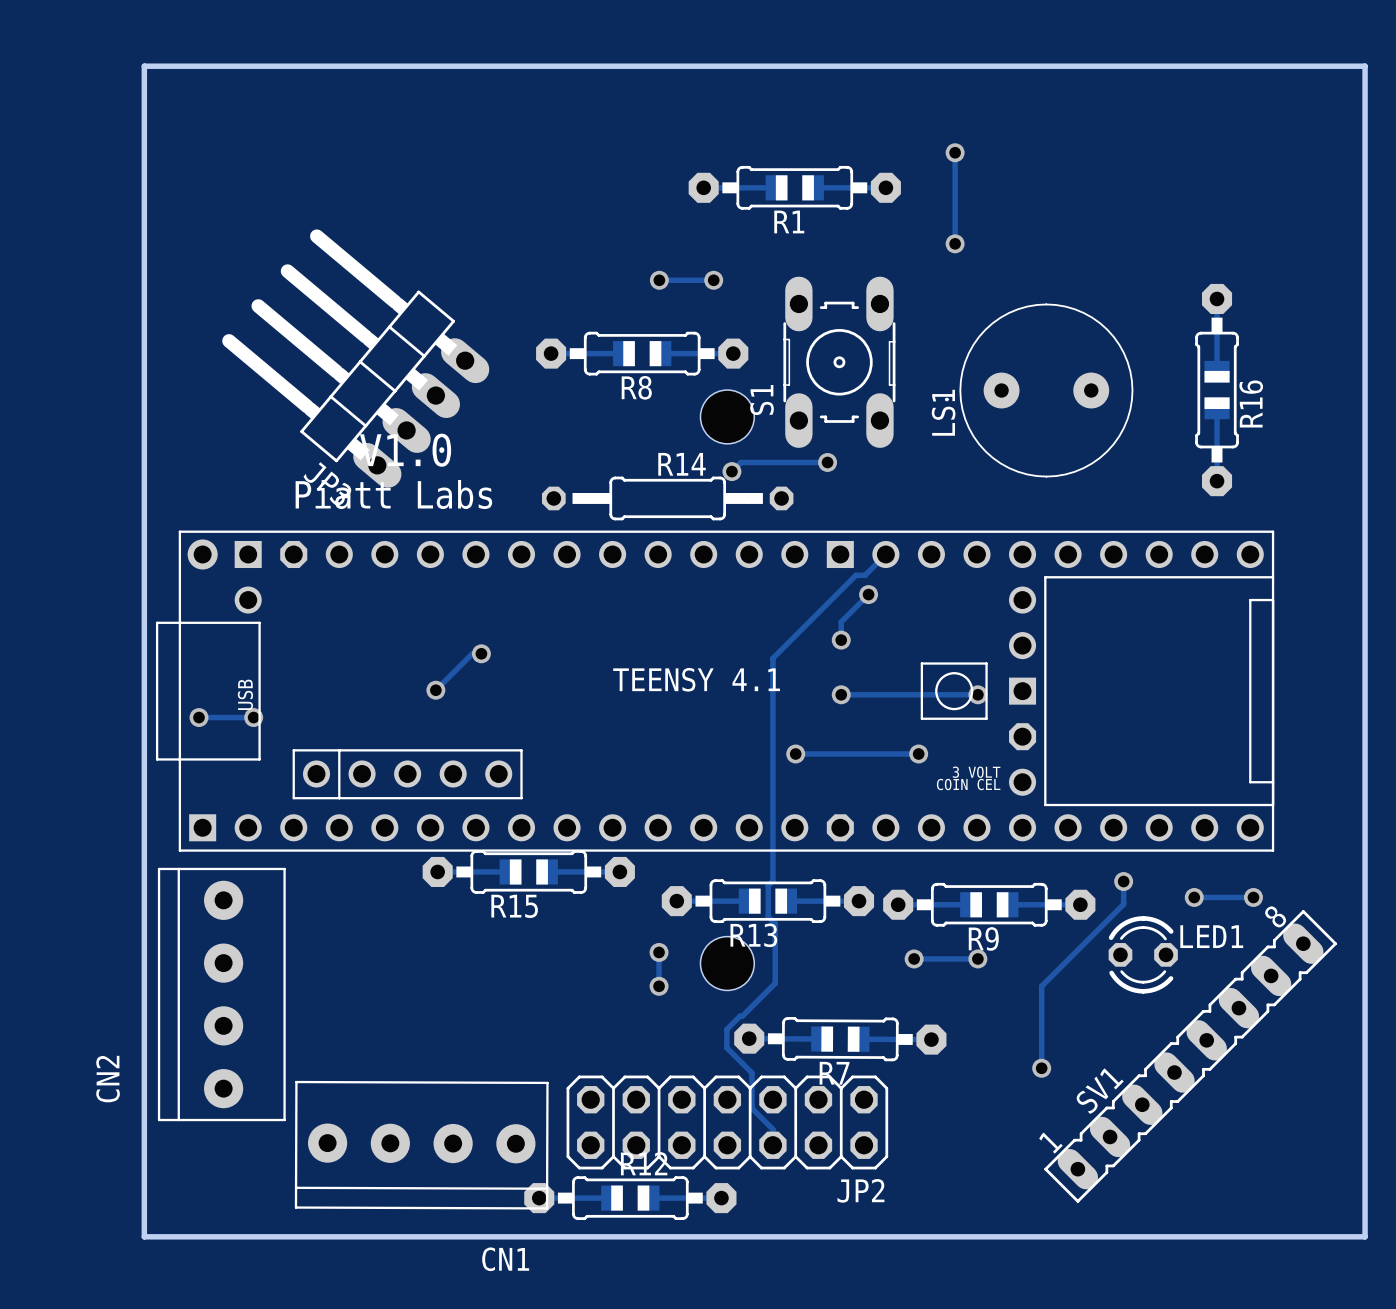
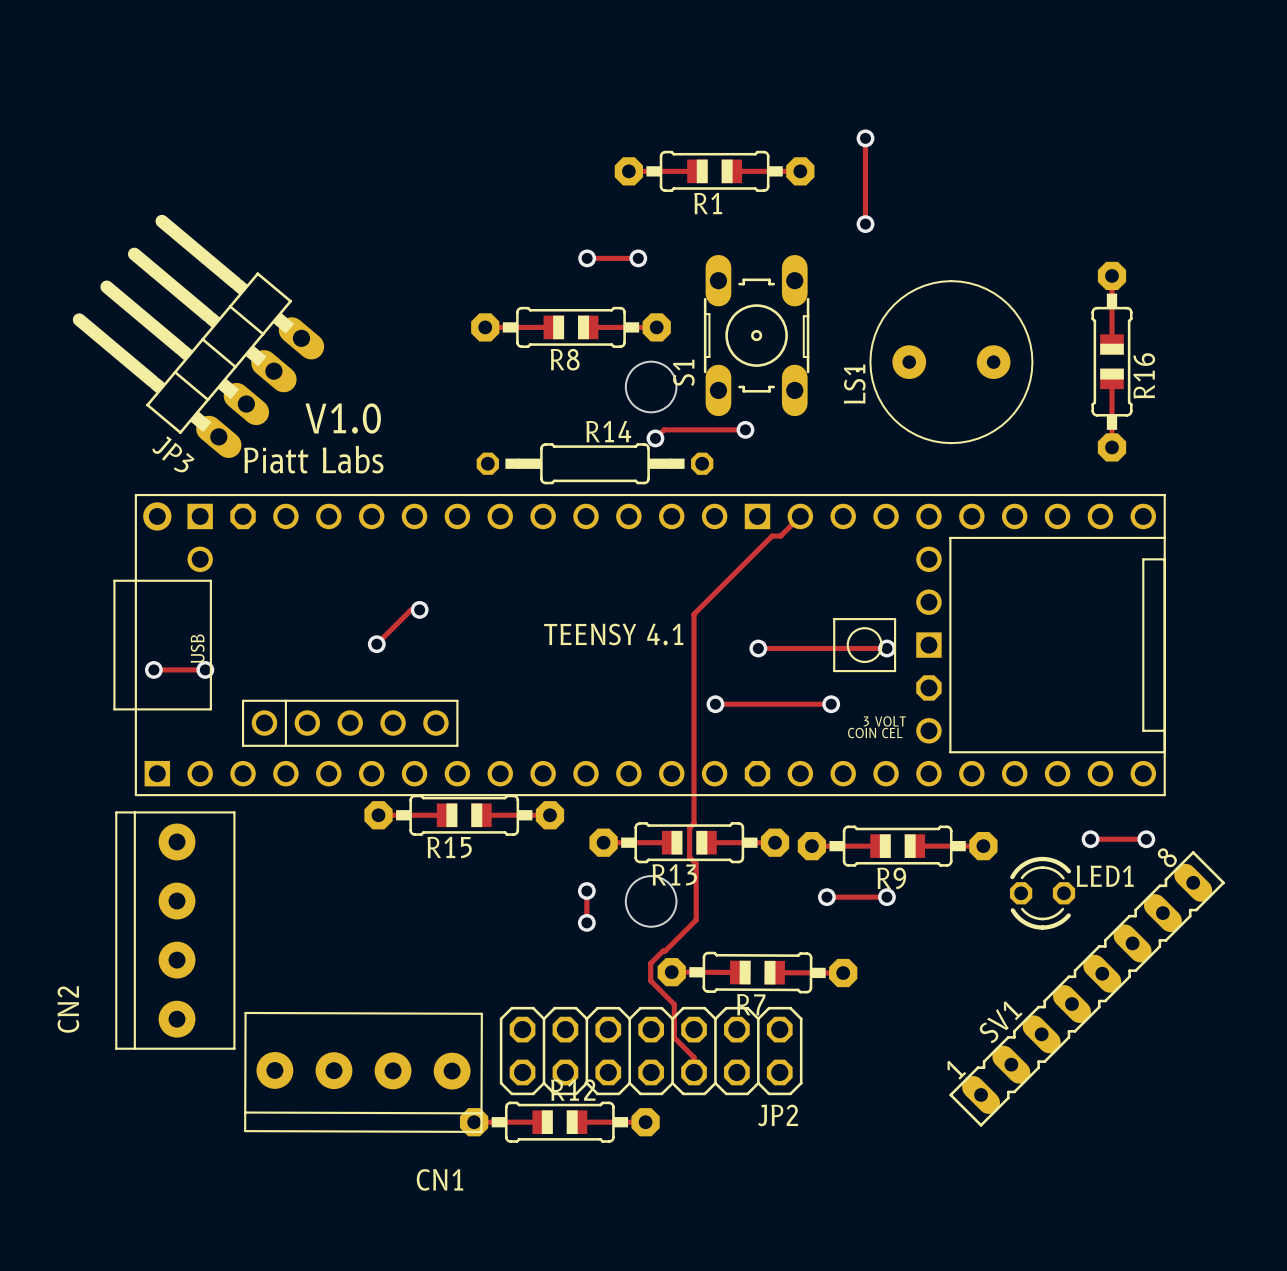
board edge: (144, 66) (144, 1236) (1365, 1236) (1365, 66) (144, 66) -> none
JP3 footprint: [222, 229, 490, 488] -> [72, 214, 325, 458]
track: (868, 594) (841, 621) (841, 640) -> none
via: (868, 594) -> none
via: (841, 640) -> none
track: (1123, 881) (1123, 904) (1041, 986) (1041, 1068) -> none
via: (1123, 881) -> none
via: (1041, 1068) -> none

